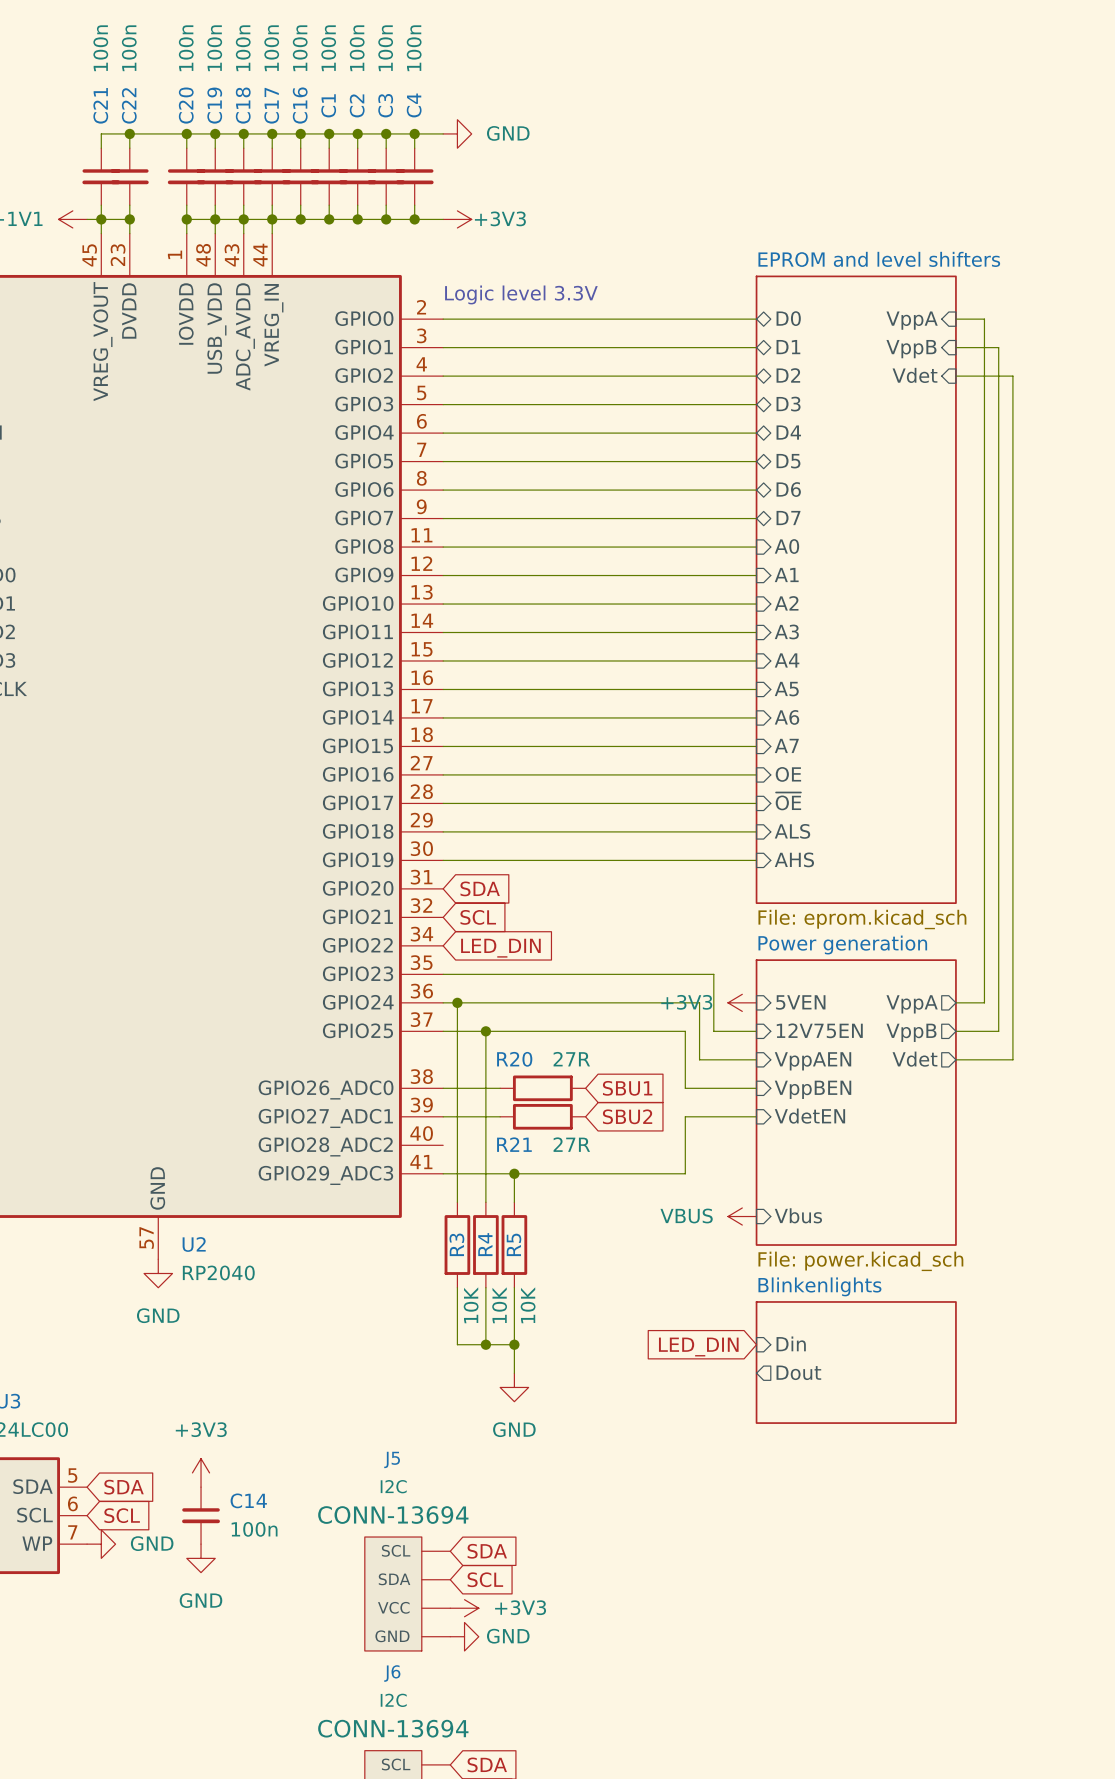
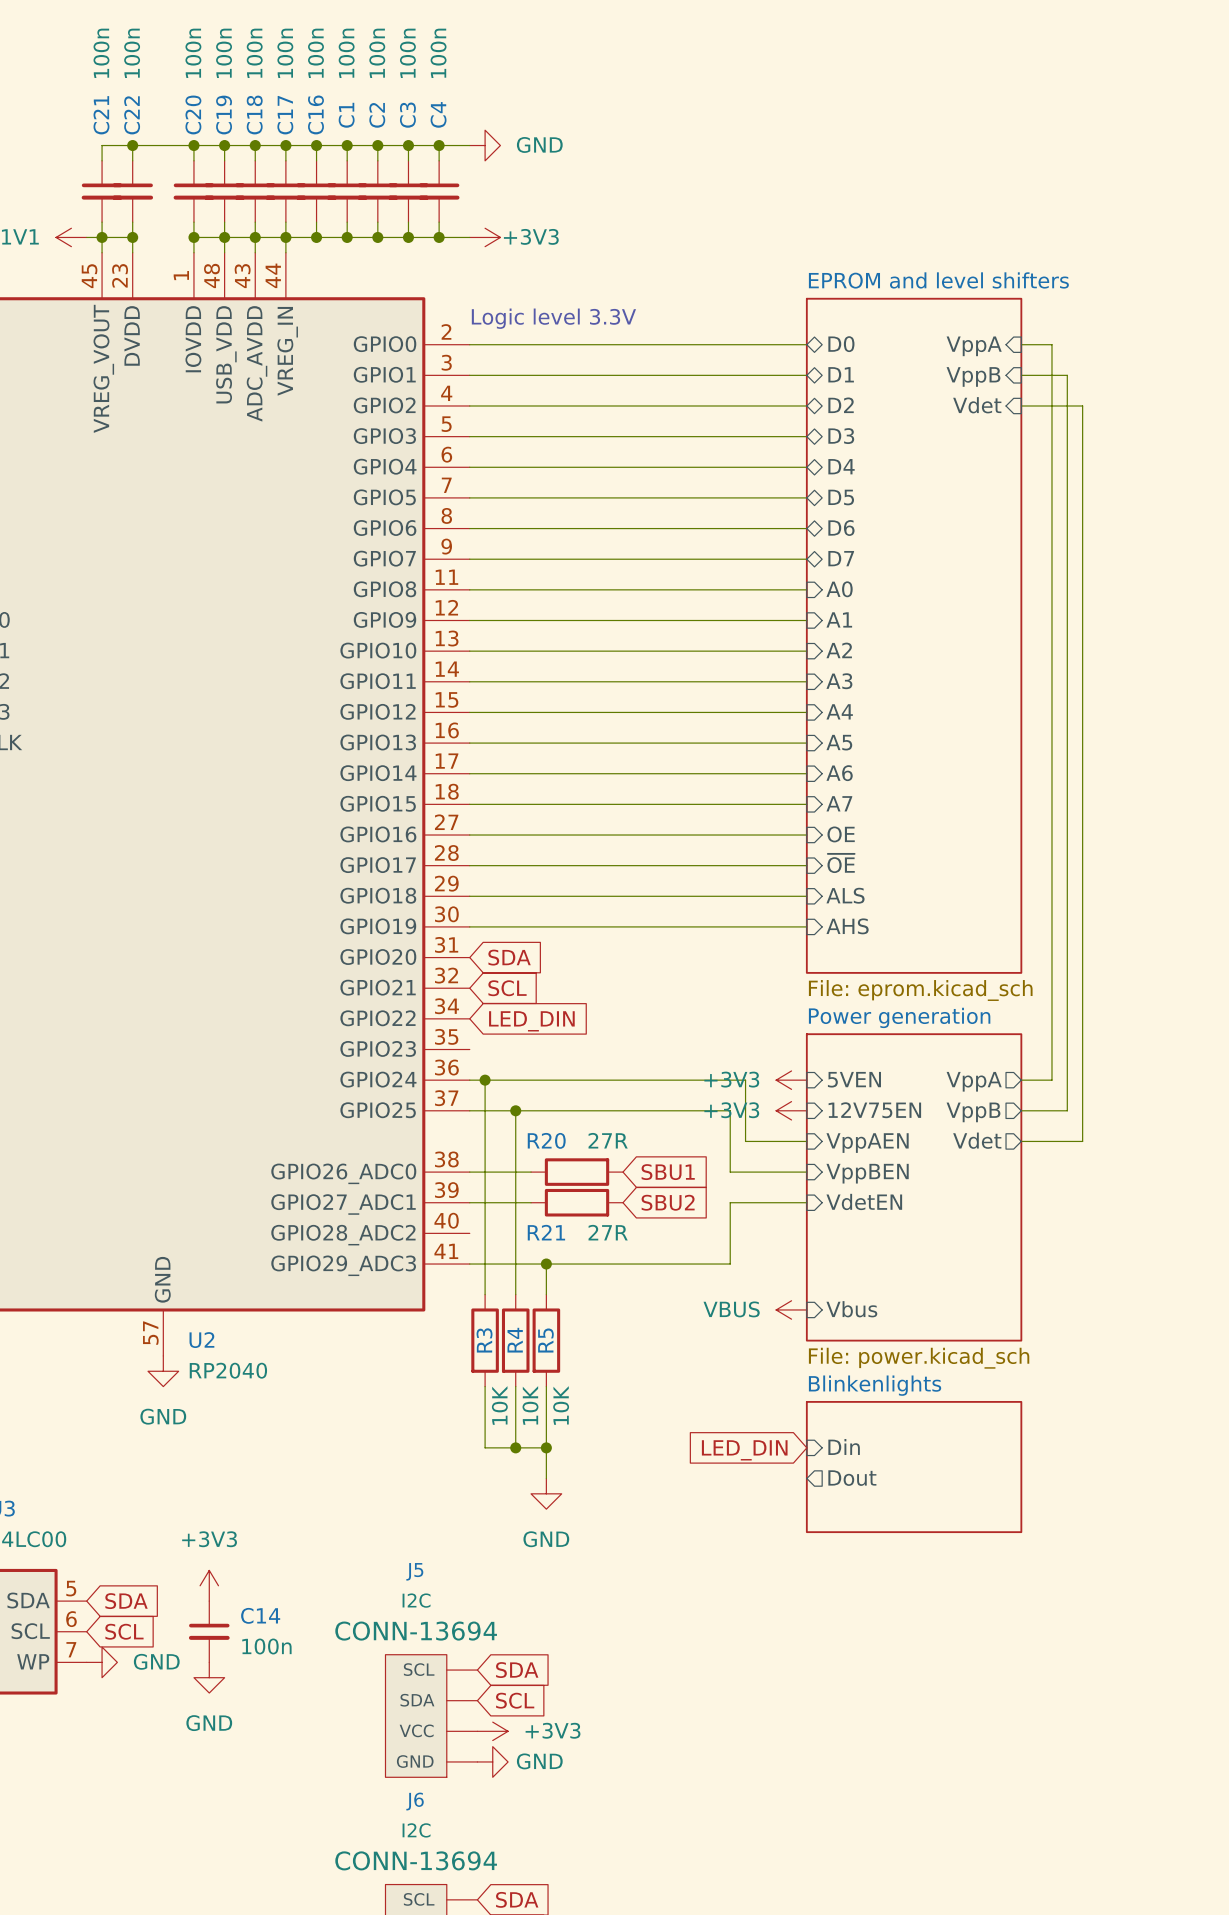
wire: (443, 974) (713, 974) (713, 1031) (756, 1031) -> none
power symbol: none -> +3V3 (791, 1110)

